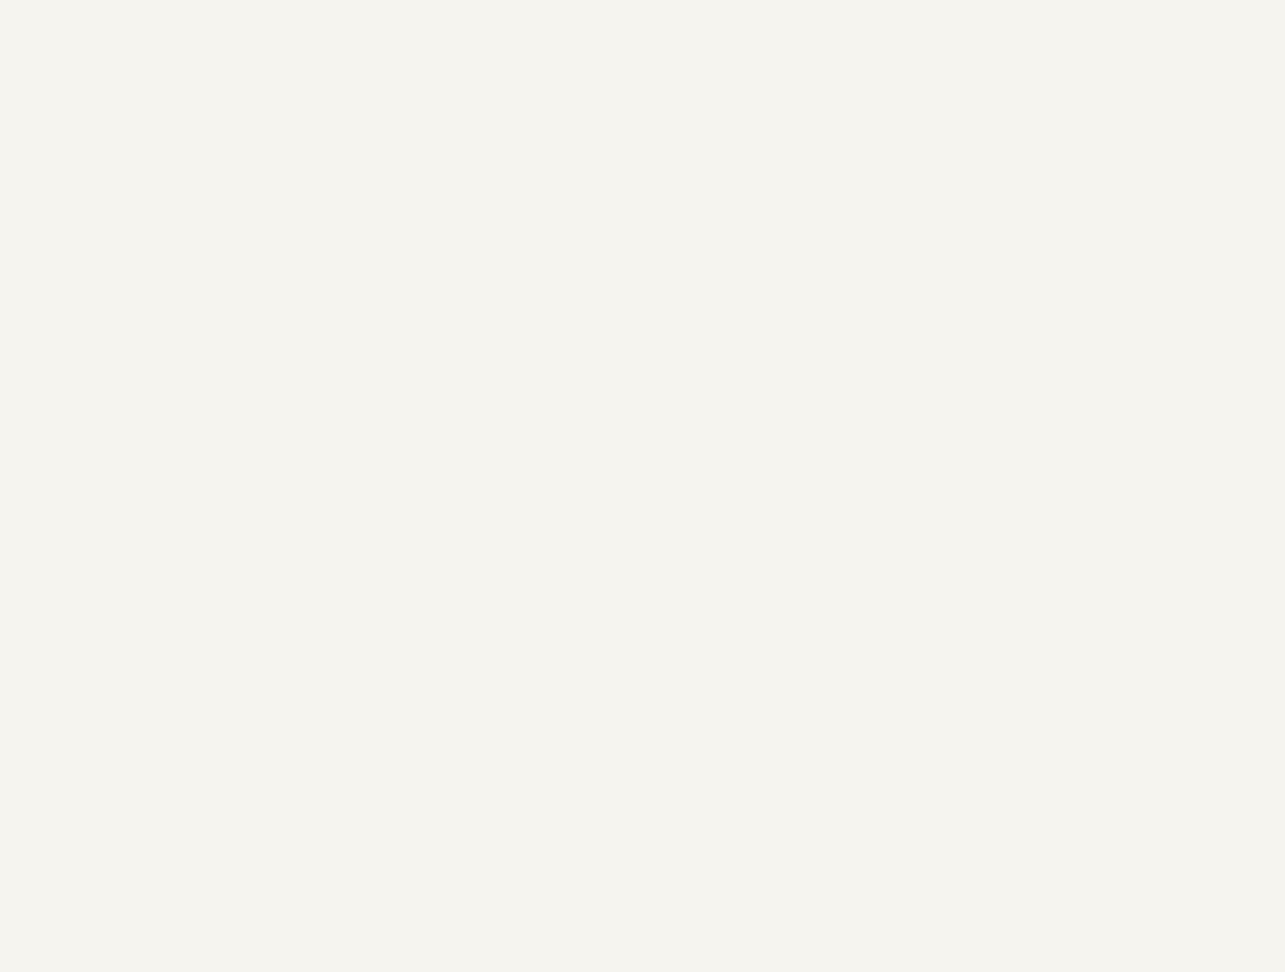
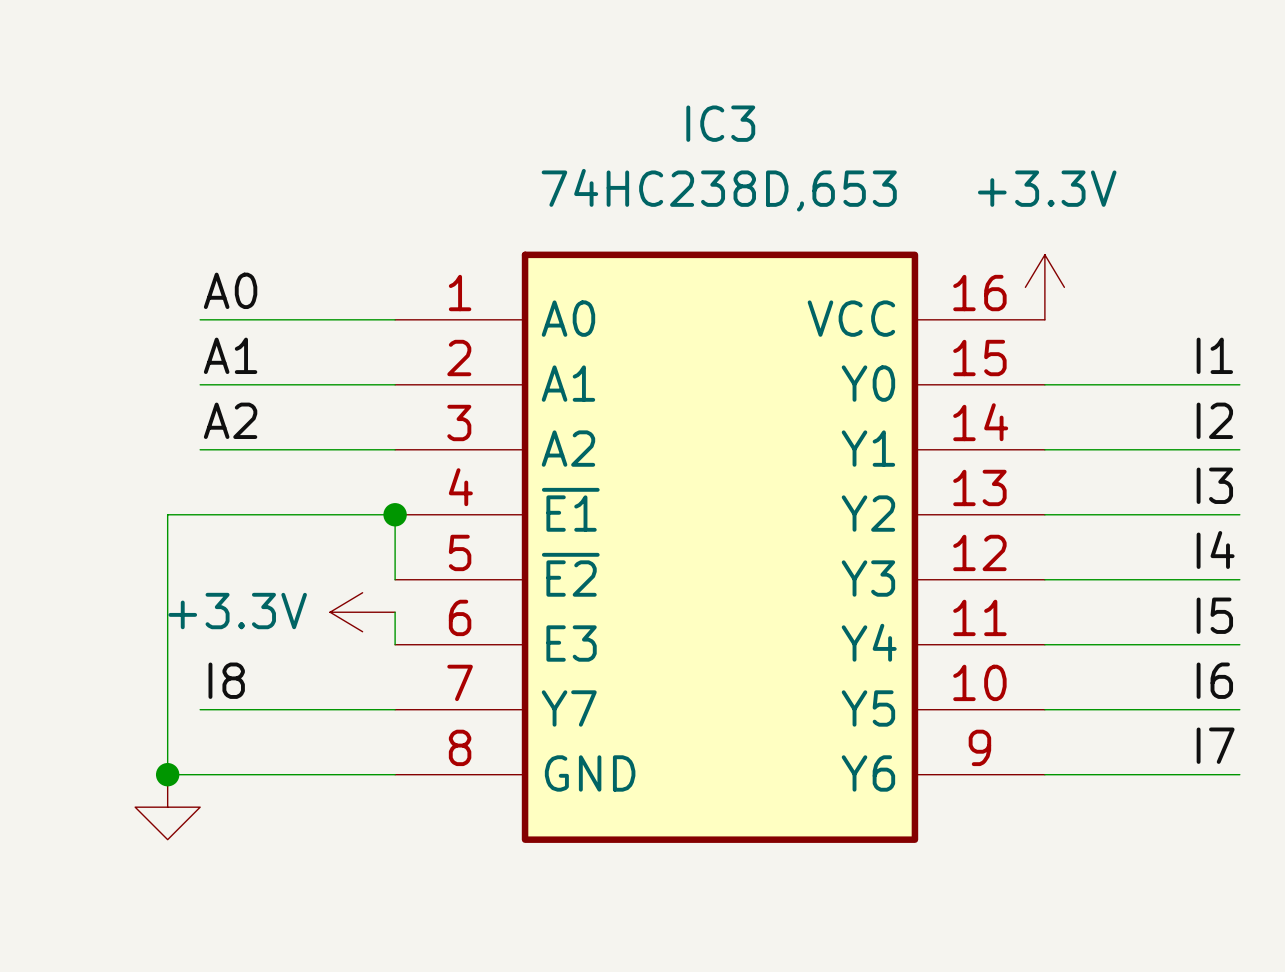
power symbol: none -> +3.3V (1044, 287)
label: none -> A0 (230, 290)
wire: none -> (200, 319) (395, 319)
label: none -> A1 (230, 355)
label: none -> I1 (1214, 355)
wire: none -> (200, 384) (395, 384)
wire: none -> (1044, 384) (1239, 384)
label: none -> A2 (230, 420)
label: none -> I2 (1214, 420)
wire: none -> (200, 449) (395, 449)
wire: none -> (1044, 449) (1239, 449)
label: none -> I3 (1214, 485)
junction: none -> (395, 514)
wire: none -> (1044, 514) (1239, 514)
IC3: none -> 74HC238D,653 (720, 547)
label: none -> I4 (1215, 549)
wire: none -> (395, 579) (395, 514) (167, 514) (167, 774) (395, 774)
wire: none -> (1044, 579) (1239, 579)
power symbol: none -> +3.3V (362, 612)
wire: none -> (395, 612) (395, 644)
label: none -> I5 (1214, 615)
wire: none -> (1044, 644) (1239, 644)
label: none -> I8 (226, 680)
label: none -> I6 (1214, 680)
wire: none -> (200, 709) (395, 709)
wire: none -> (1044, 709) (1239, 709)
label: none -> I7 (1215, 745)
junction: none -> (167, 774)
wire: none -> (1044, 774) (1239, 774)
power symbol: none -> (167, 807)

